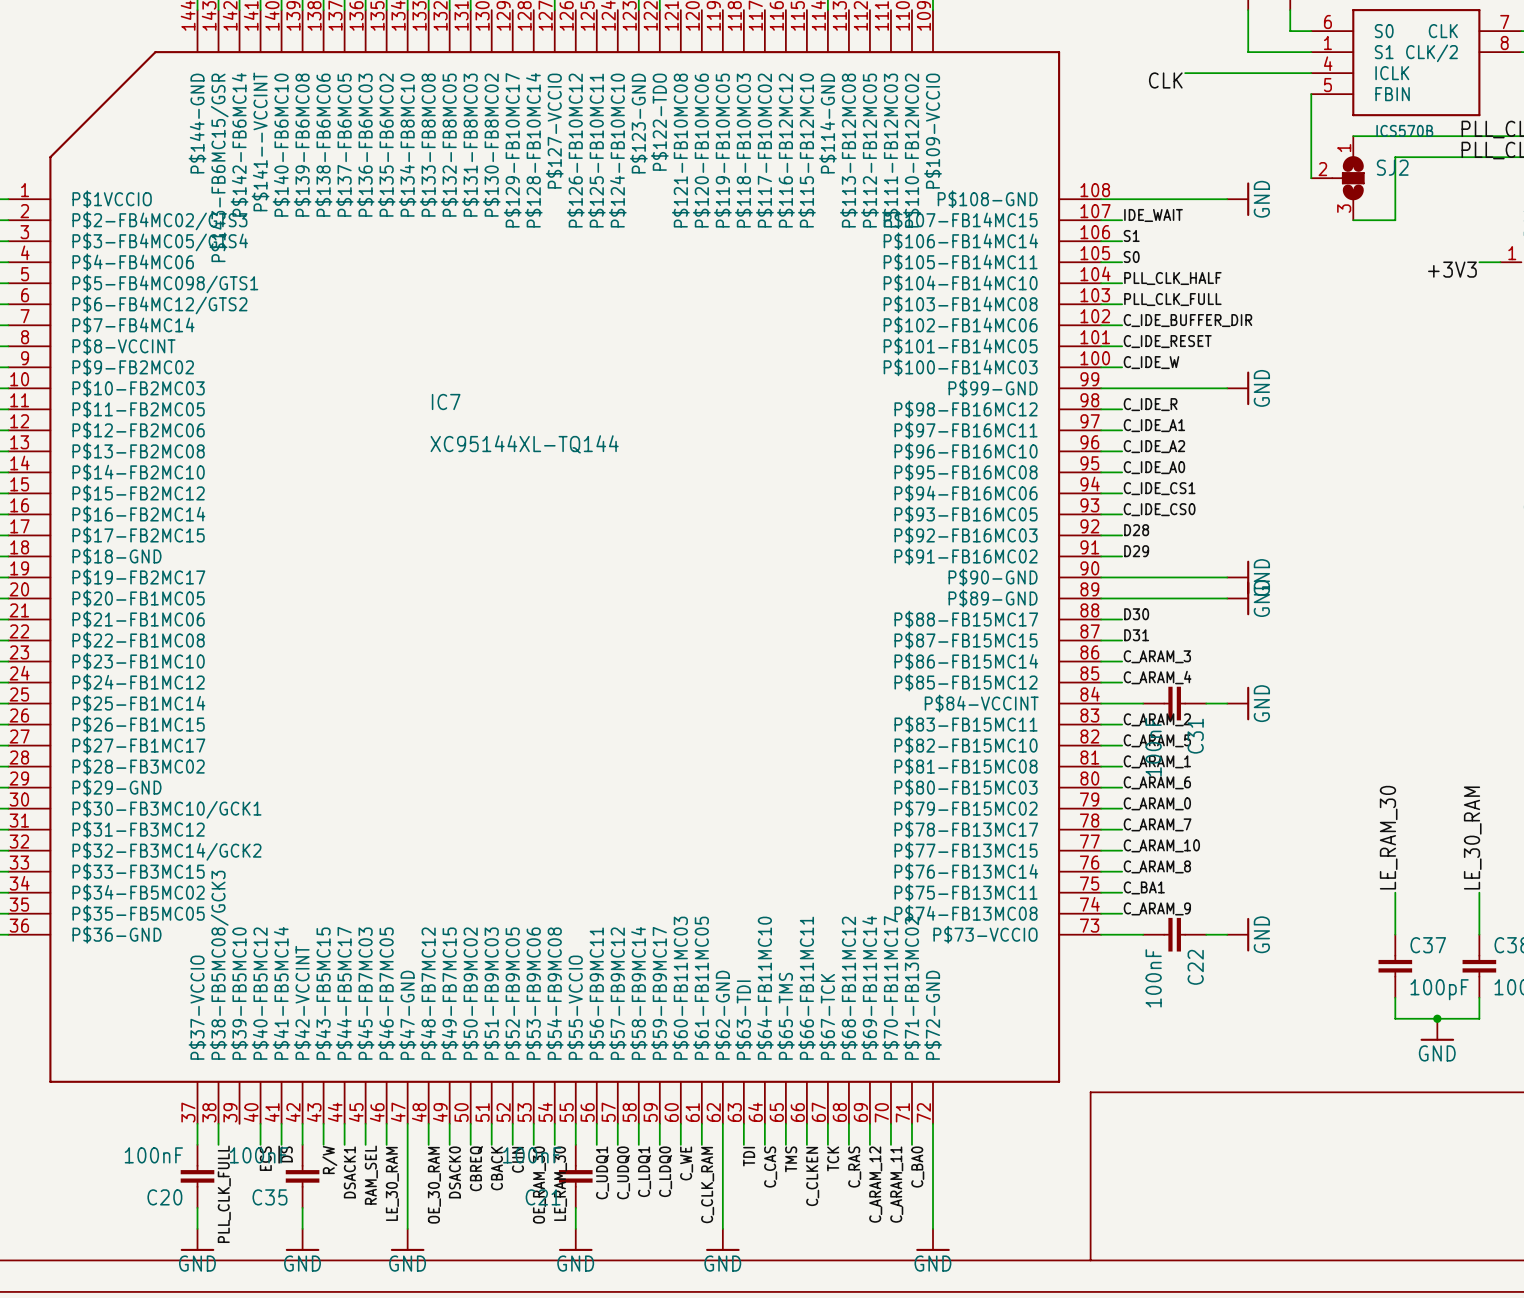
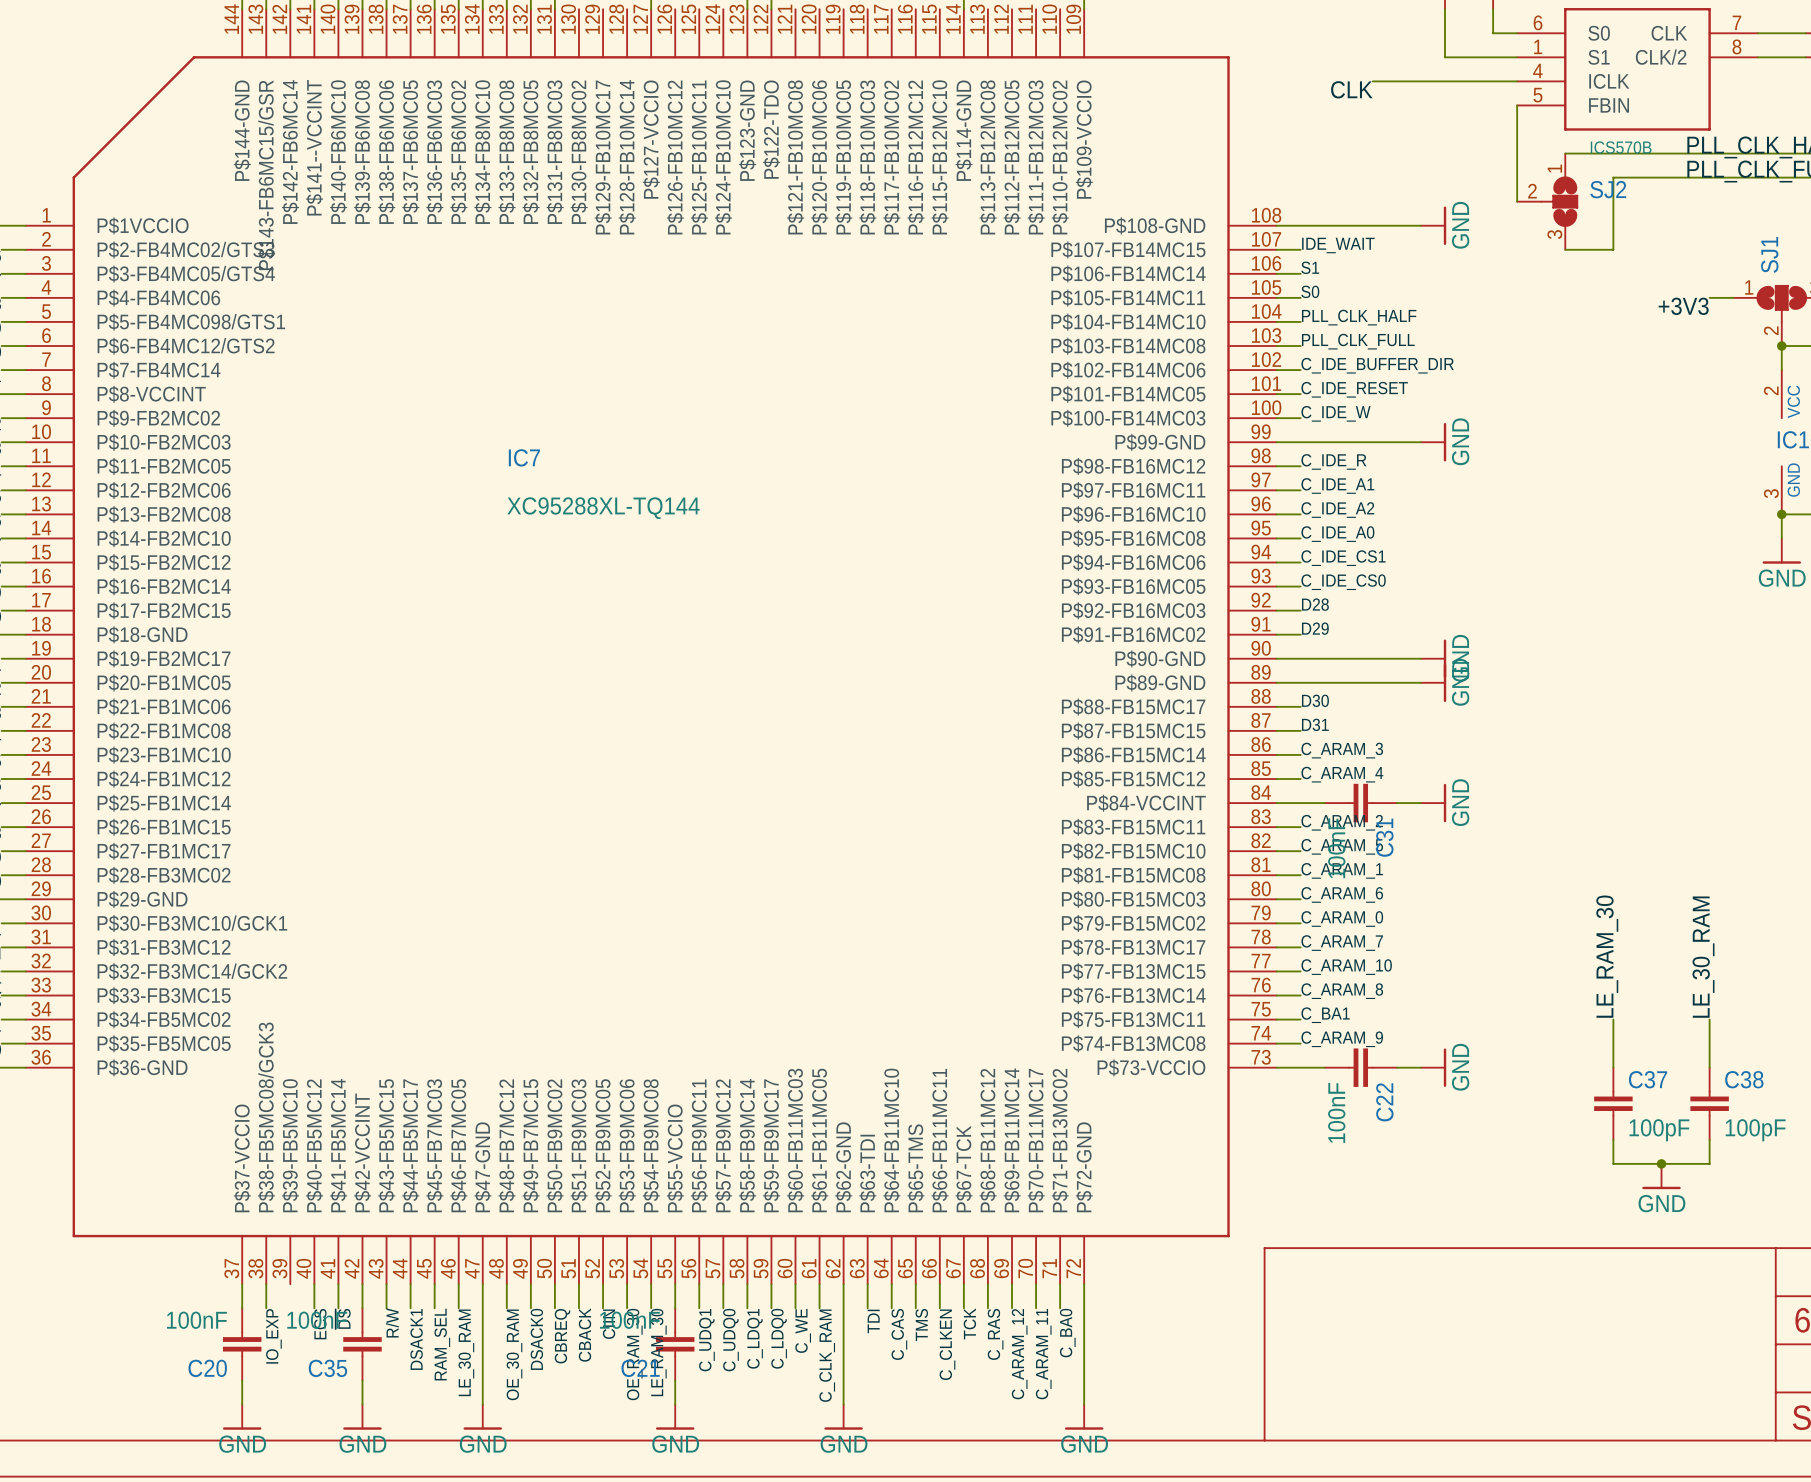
IC7 value: XC95144XL-TQ144 (524, 444) -> XC95288XL-TQ144 (603, 508)
label: PLL_CLK_FULL (224, 1194) -> IO_EXP (273, 1336)

